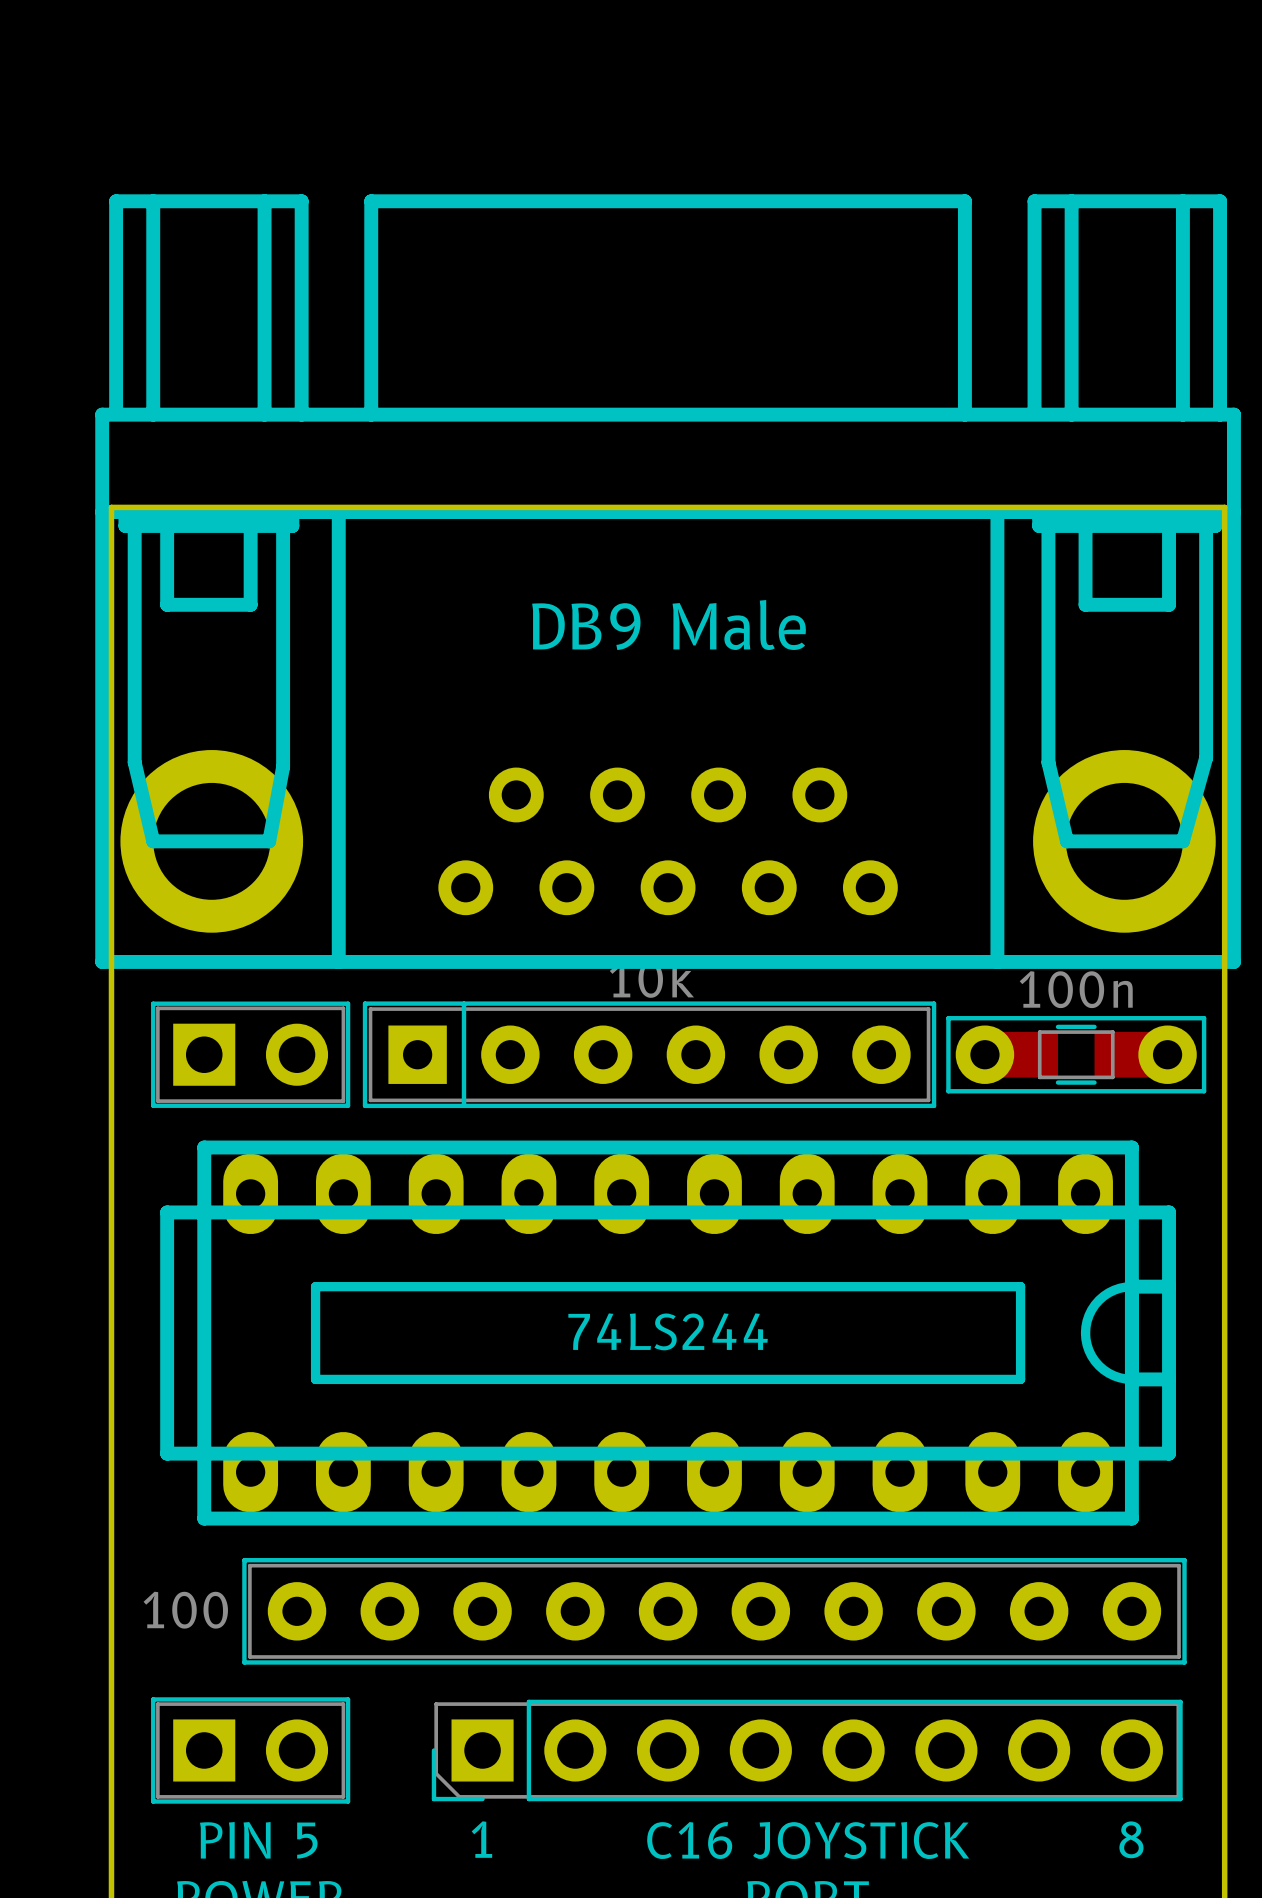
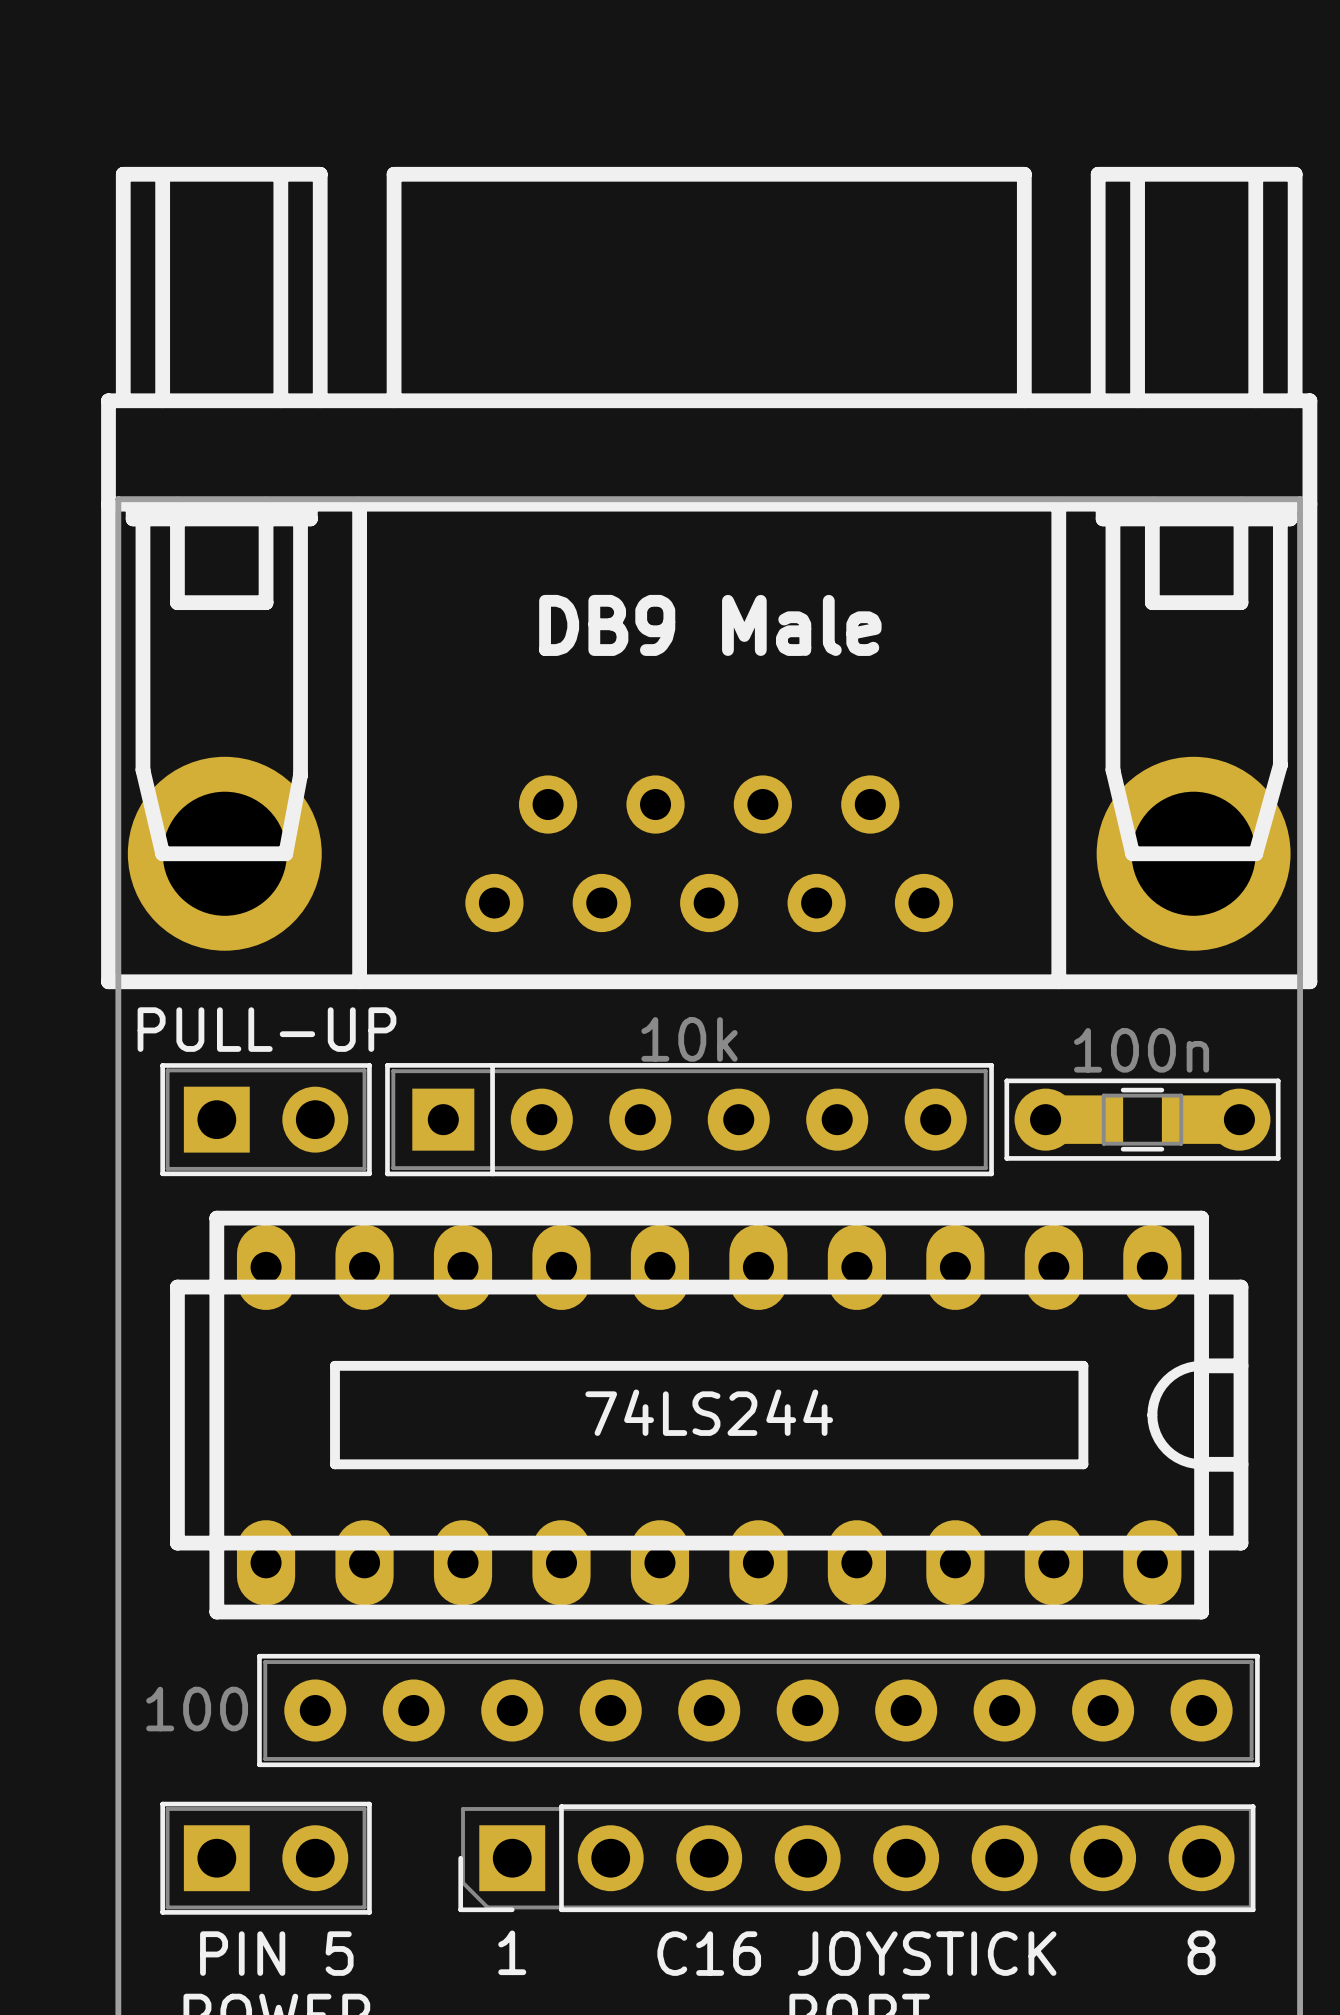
board edge: (111, 507) (1224, 507) -> (118, 538) (118, 499) (1300, 499) (1300, 538)
part position: (668, 581) -> (709, 578)
text: none -> PULL-UP (266, 1029)

